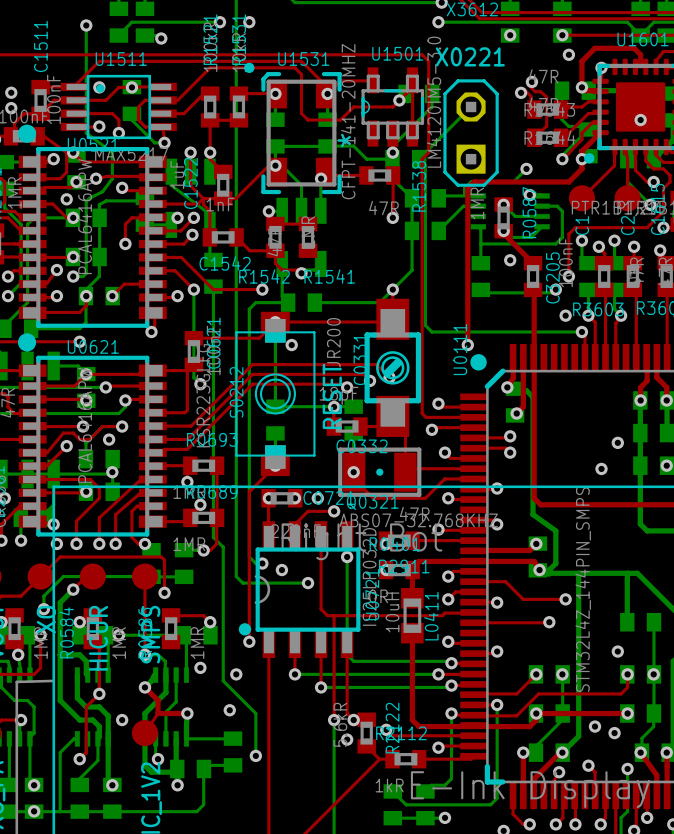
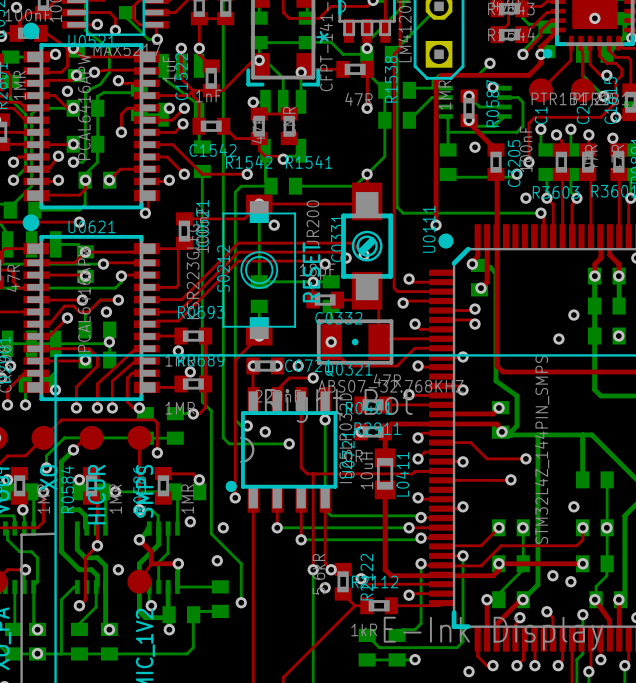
bottom track: (193, 289) (193, 377) (200, 384) -> none
via: (200, 384) -> none
via: (56, 543) -> none
via: (386, 543) -> none

